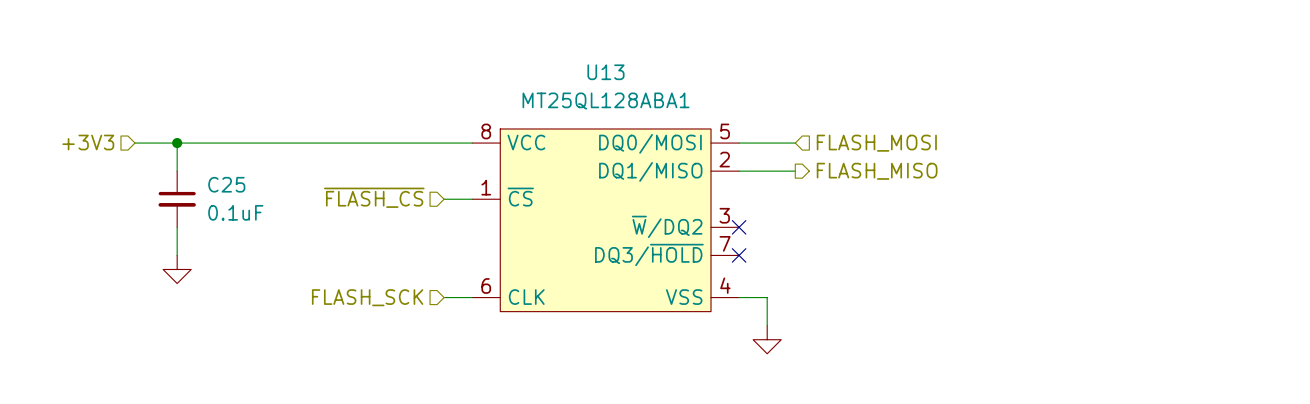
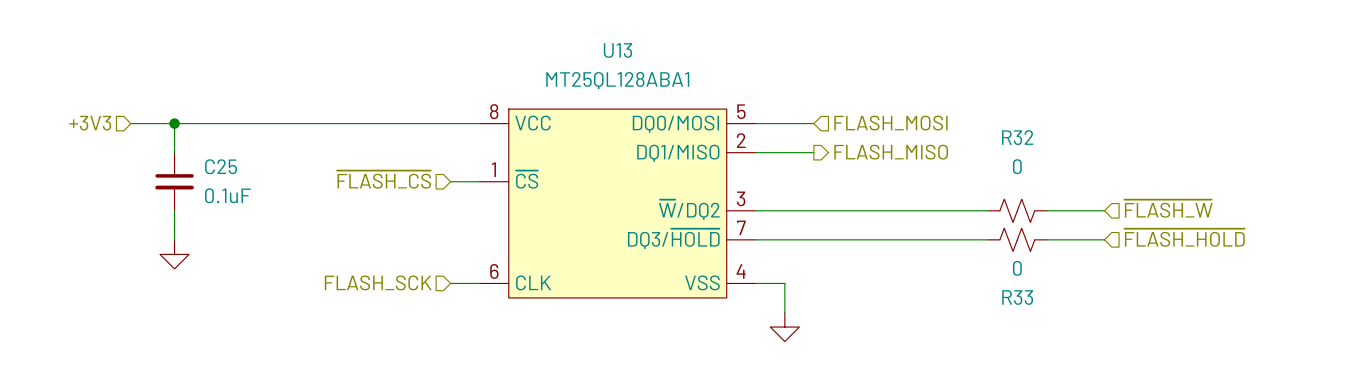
hierarchical label: none -> ~{FLASH_W} (1168, 208)
wire: none -> (755, 210) (988, 210)
no-connect mark: (739, 227) -> none
R32: none -> 0 (1017, 210)
wire: none -> (1046, 210) (1104, 210)
hierarchical label: none -> ~{FLASH_HOLD} (1184, 237)
wire: none -> (755, 239) (988, 239)
no-connect mark: (739, 255) -> none
R33: none -> 0 (1017, 239)
wire: none -> (1046, 239) (1104, 239)

